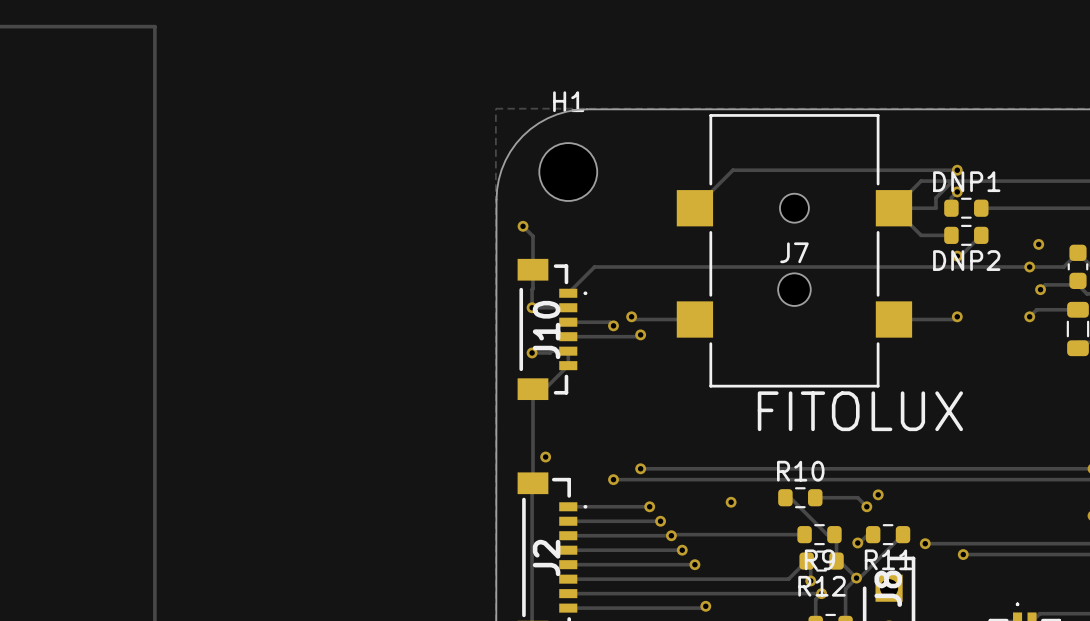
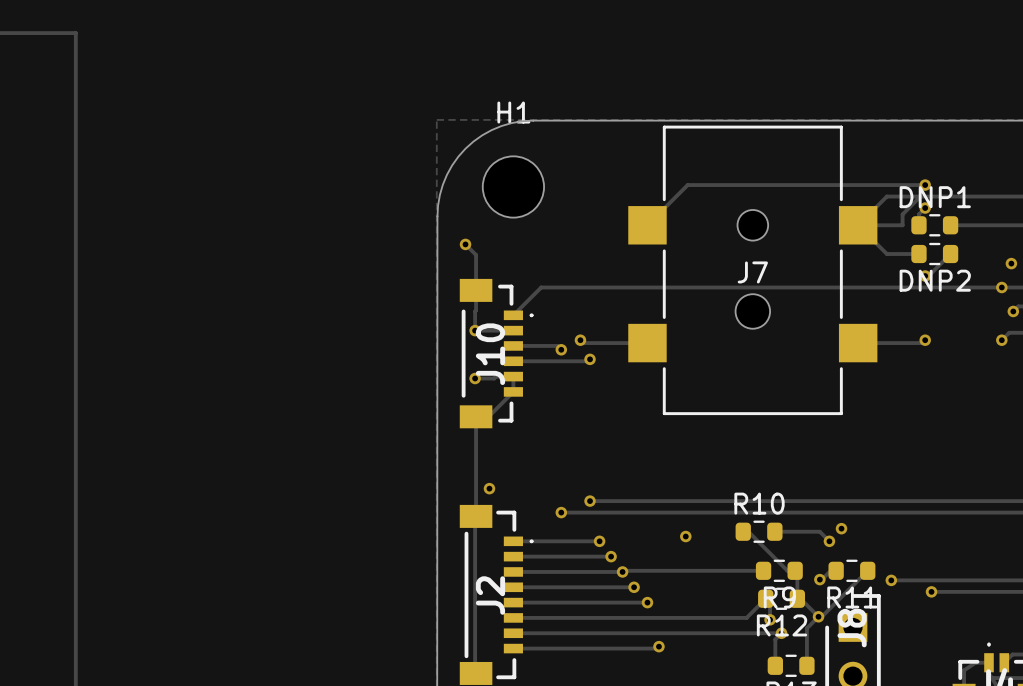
text: FITOLUX (860, 411) -> none

